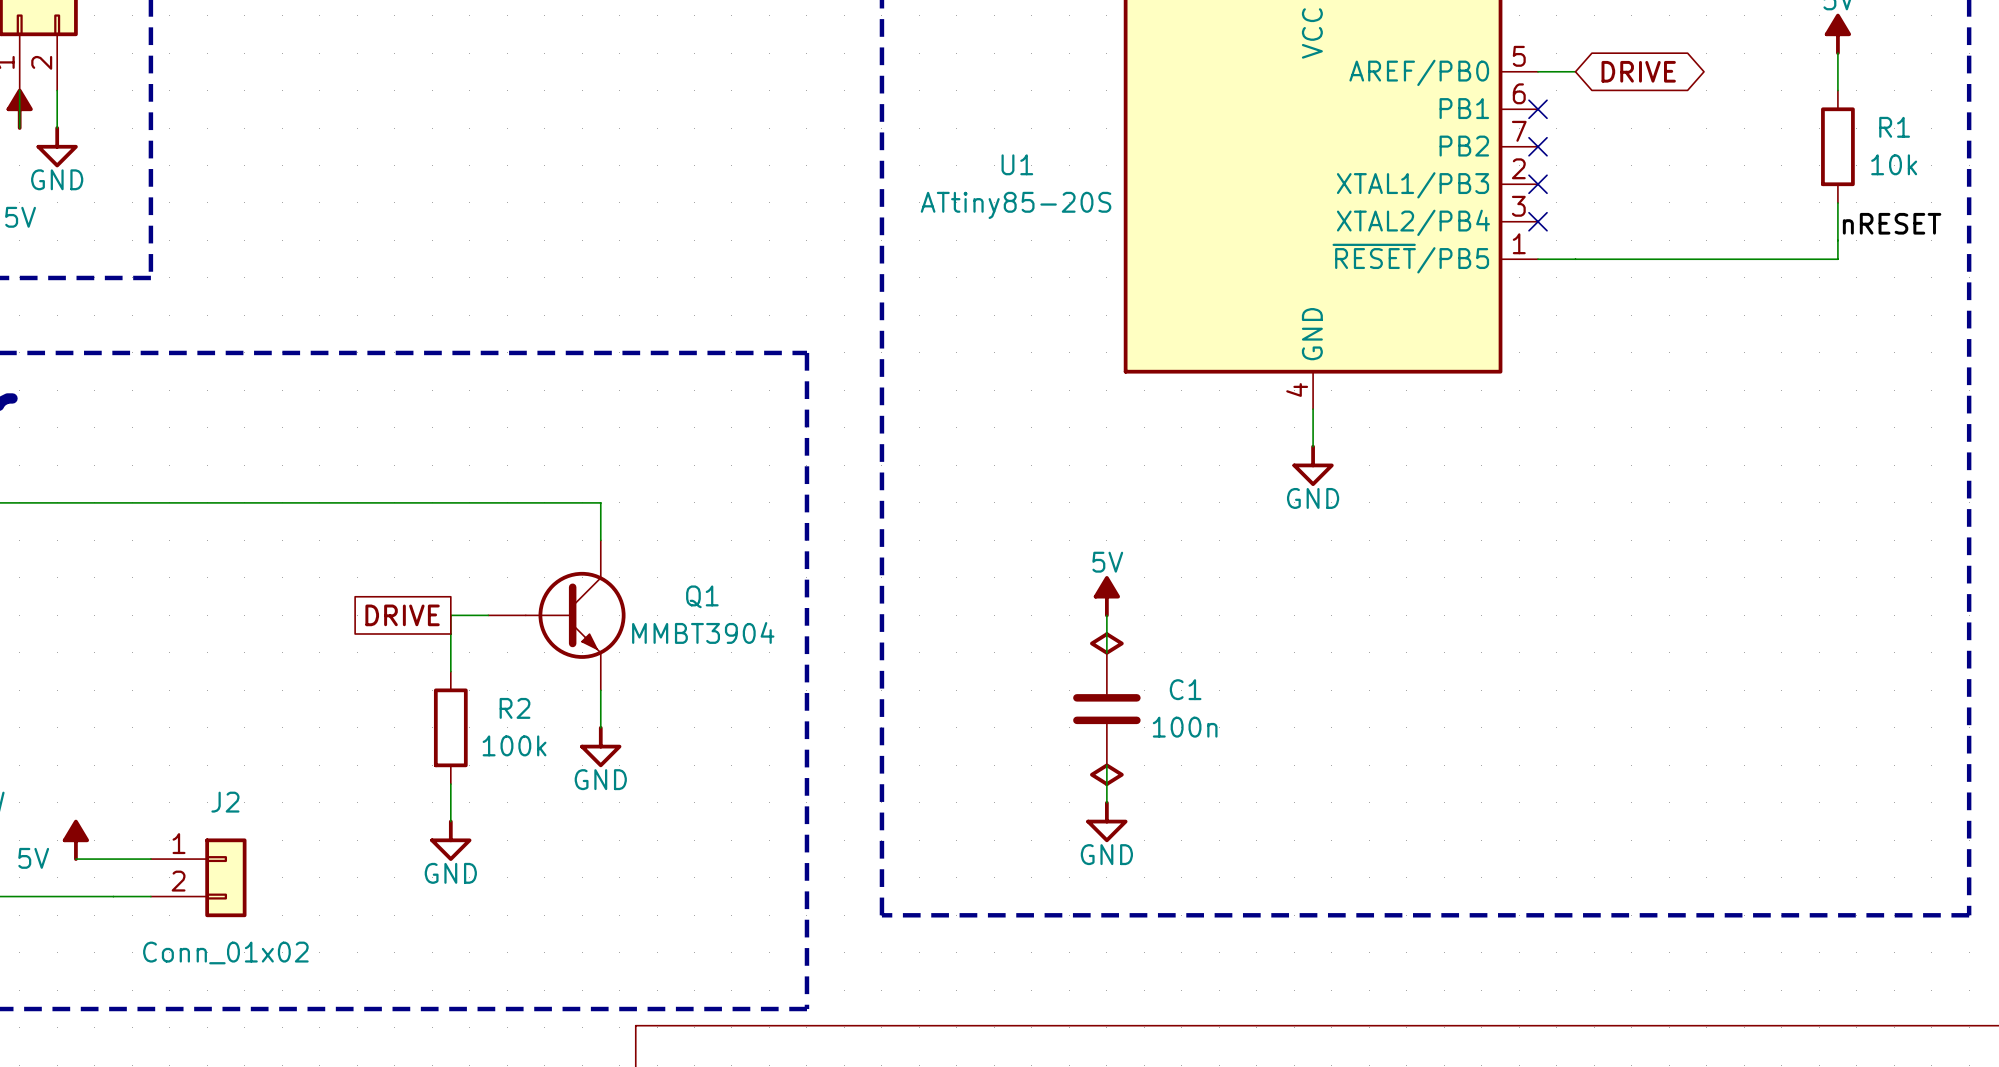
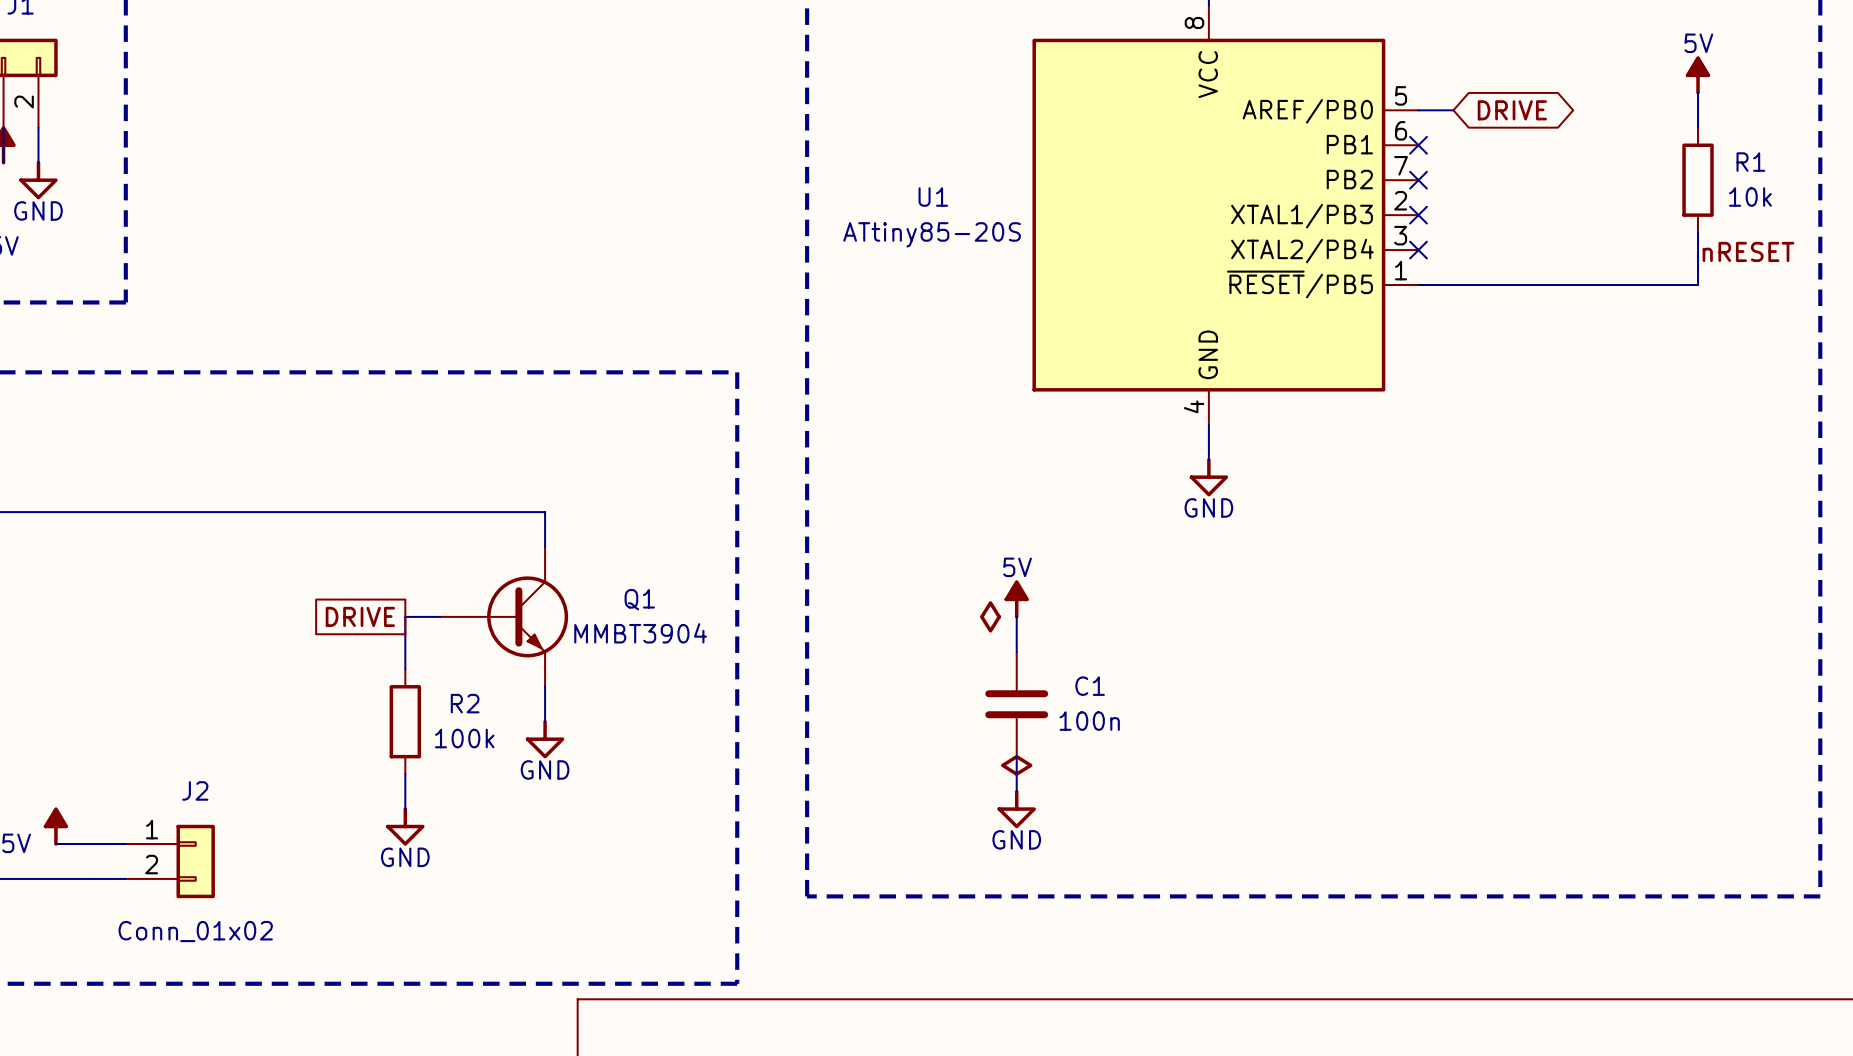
power symbol rotation: 0° (1106, 643) -> 90° clockwise (990, 616)
power symbol position: (1106, 643) -> (990, 616)

